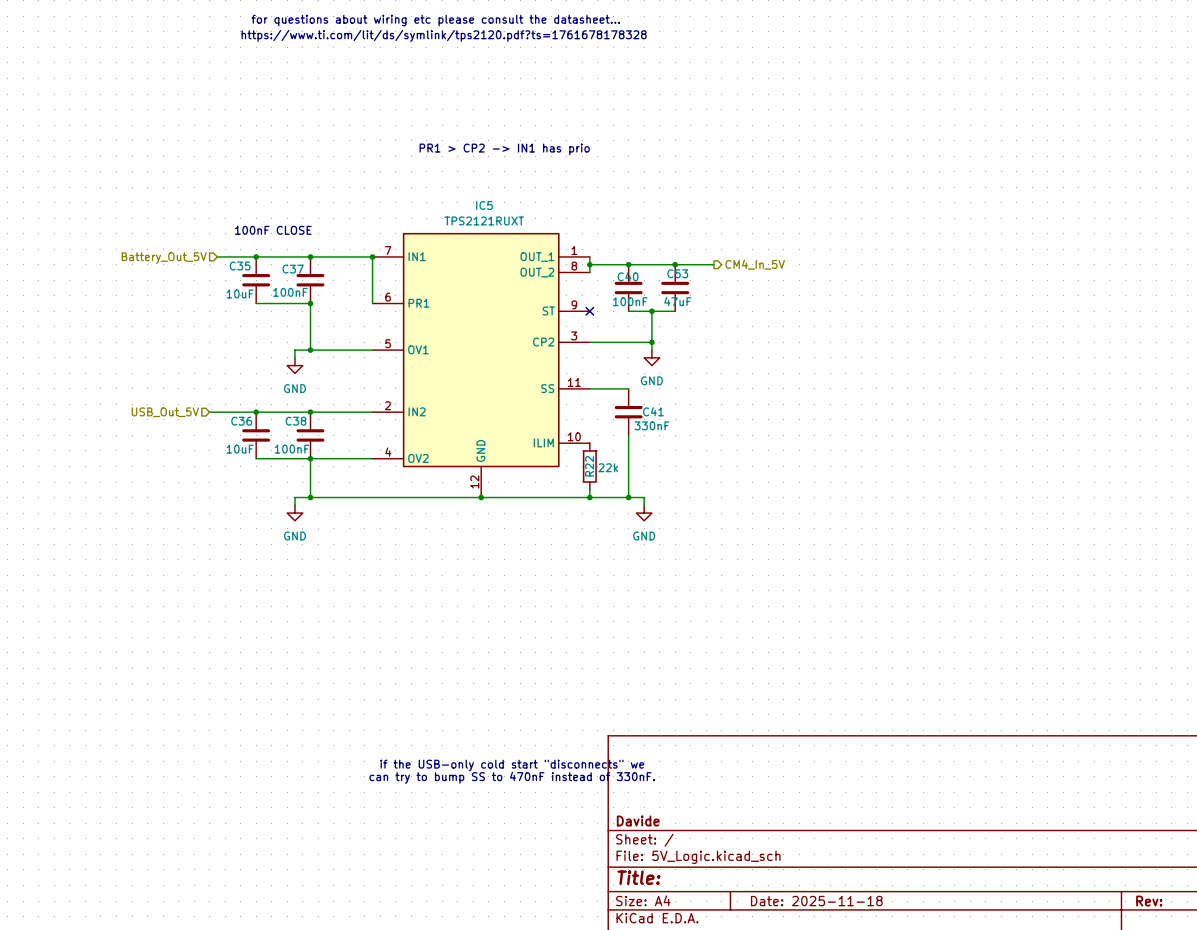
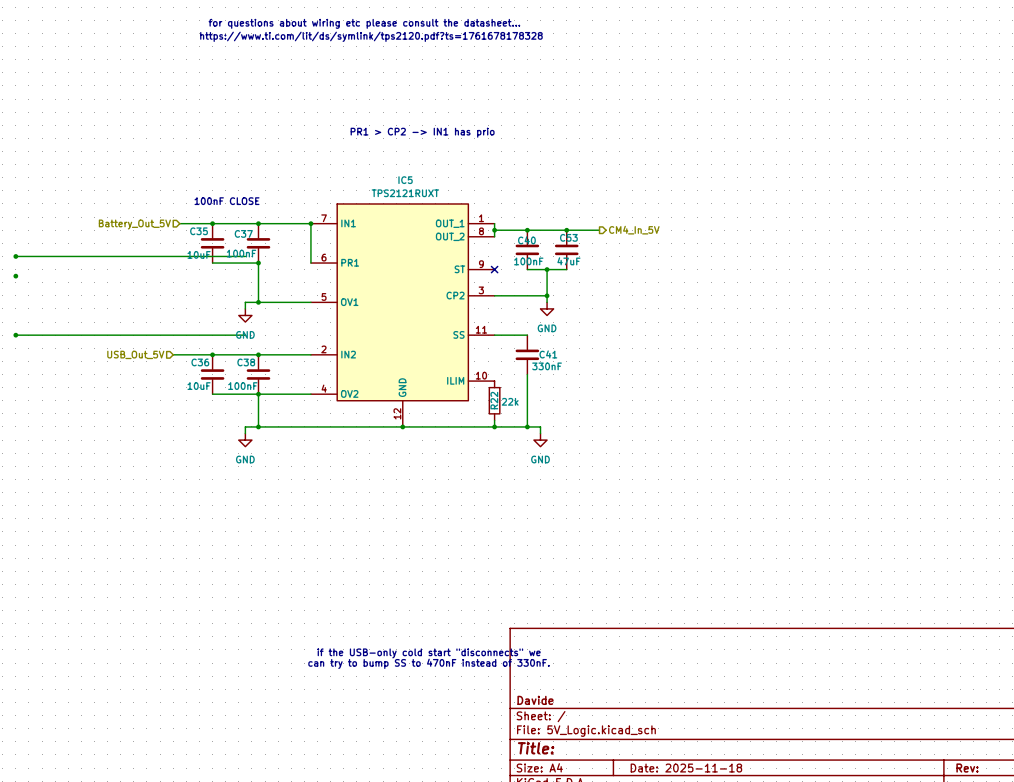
wire: none -> (15, 256) (245, 256)
junction: none -> (15, 256)
junction: none -> (15, 276)
wire: none -> (15, 335) (245, 335)
junction: none -> (15, 335)

